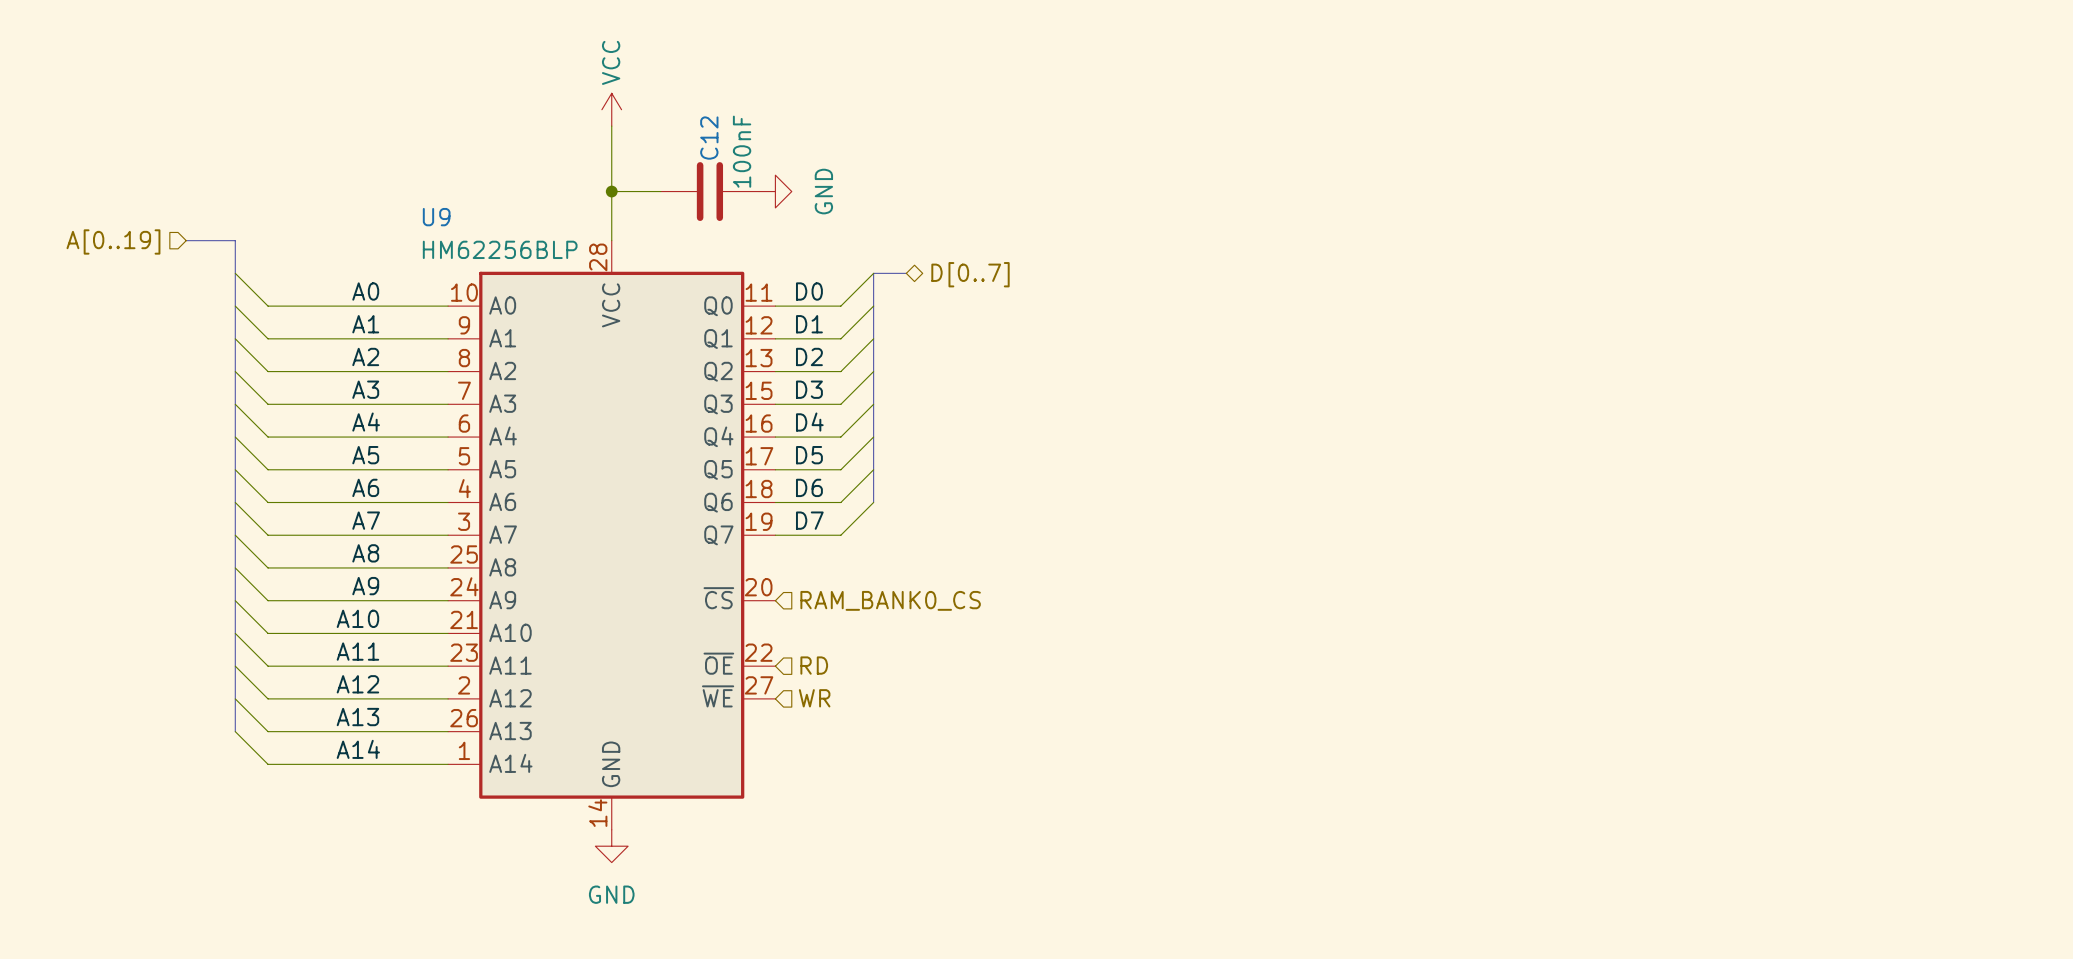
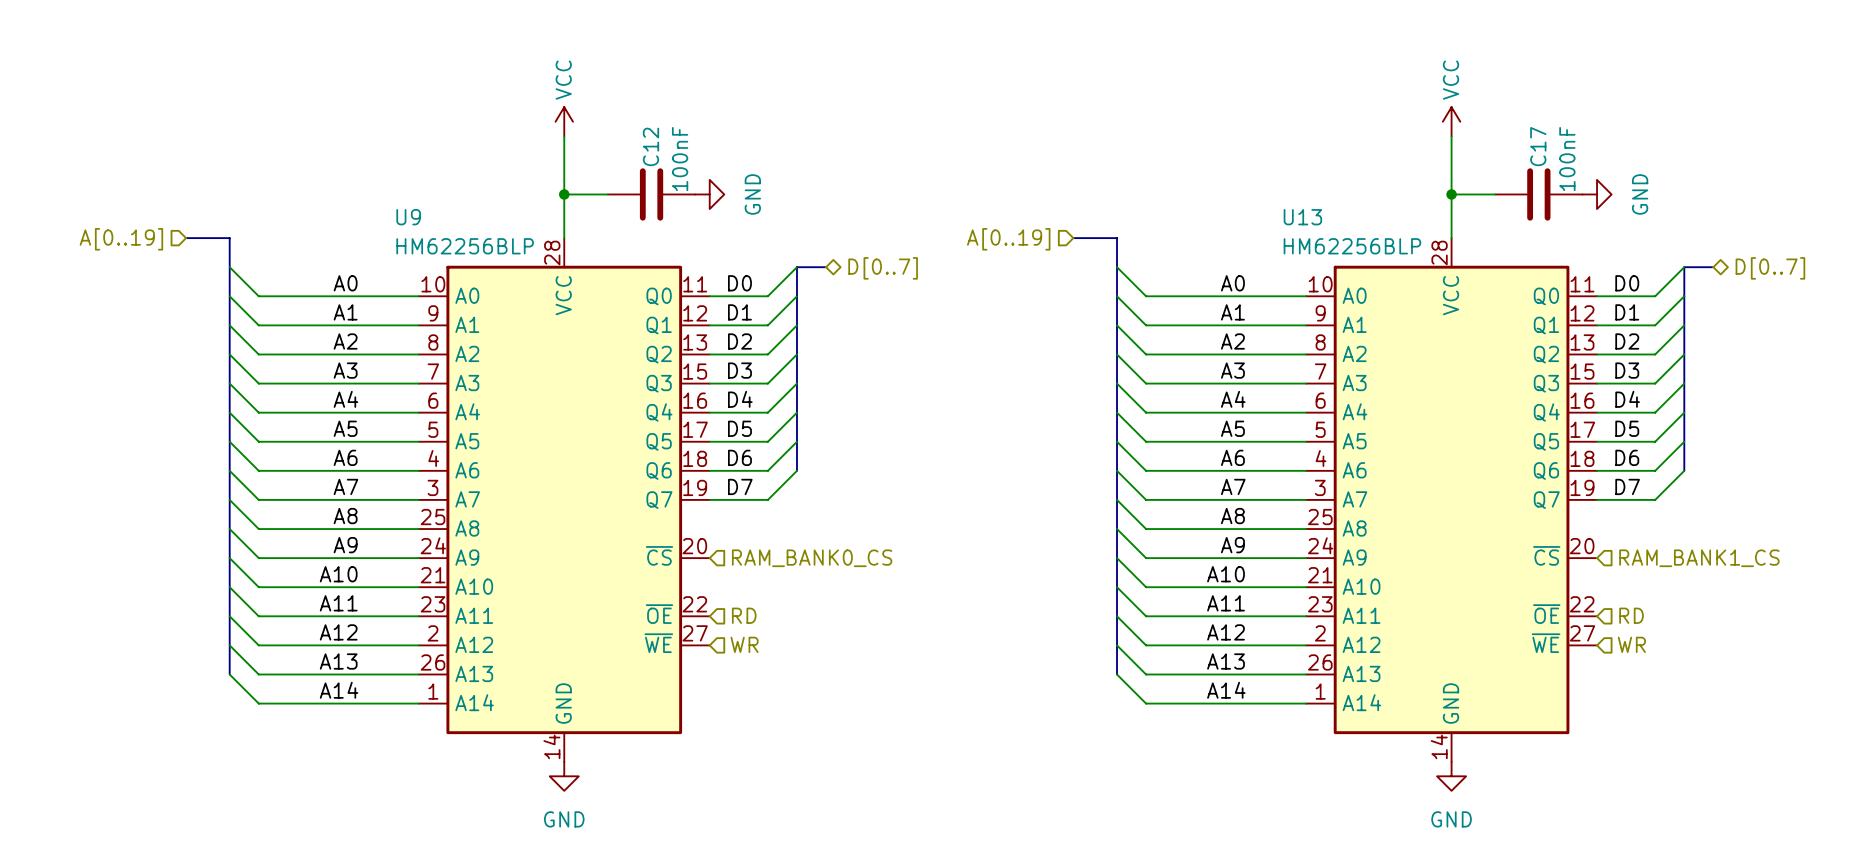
power symbol: none -> VCC (1451, 121)
wire: none -> (1451, 136) (1451, 238)
wire: none -> (1451, 194) (1495, 194)
junction: none -> (1451, 194)
C17: none -> 100nF (1538, 194)
power symbol: none -> GND (1597, 194)
bus: none -> (1073, 238) (1117, 238) (1117, 674)
hierarchical label: none -> A[0..19] (1008, 239)
wire: none -> (1117, 267) (1146, 296) (1306, 296)
wire: none -> (1684, 267) (1655, 296) (1597, 296)
bus: none -> (1713, 267) (1684, 267) (1684, 470)
hierarchical label: none -> D[0..7] (1770, 268)
label: none -> A0 (1232, 283)
label: none -> D0 (1627, 283)
wire: none -> (1117, 296) (1146, 325) (1306, 325)
wire: none -> (1684, 296) (1655, 325) (1597, 325)
label: none -> A1 (1232, 312)
label: none -> D1 (1627, 312)
wire: none -> (1117, 325) (1146, 354) (1306, 354)
wire: none -> (1684, 325) (1655, 354) (1597, 354)
label: none -> A2 (1232, 341)
label: none -> D2 (1627, 341)
wire: none -> (1117, 354) (1146, 383) (1306, 383)
wire: none -> (1684, 354) (1655, 383) (1597, 383)
label: none -> A3 (1232, 370)
label: none -> D3 (1627, 370)
wire: none -> (1117, 383) (1146, 412) (1306, 412)
wire: none -> (1684, 383) (1655, 412) (1597, 412)
label: none -> A4 (1233, 399)
label: none -> D4 (1627, 399)
wire: none -> (1117, 412) (1146, 441) (1306, 441)
wire: none -> (1684, 412) (1655, 441) (1597, 441)
label: none -> A5 (1232, 428)
label: none -> D5 (1627, 428)
wire: none -> (1117, 441) (1146, 470) (1306, 470)
wire: none -> (1684, 441) (1655, 470) (1597, 470)
label: none -> A6 (1232, 457)
label: none -> D6 (1627, 457)
wire: none -> (1117, 470) (1146, 499) (1306, 499)
wire: none -> (1684, 470) (1655, 499) (1597, 499)
label: none -> A7 (1233, 486)
label: none -> D7 (1627, 486)
wire: none -> (1117, 499) (1146, 529) (1306, 529)
U13: none -> HM62256BLP (1451, 499)
label: none -> A8 (1232, 516)
wire: none -> (1117, 529) (1146, 558) (1306, 558)
label: none -> A9 (1232, 545)
wire: none -> (1117, 558) (1146, 587) (1306, 587)
hierarchical label: none -> RAM_BANK1_CS (1699, 558)
label: none -> A10 (1225, 574)
wire: none -> (1117, 587) (1146, 616) (1306, 616)
label: none -> A11 (1225, 603)
hierarchical label: none -> RD (1631, 615)
wire: none -> (1117, 616) (1146, 645) (1306, 645)
label: none -> A12 (1225, 632)
wire: none -> (1117, 645) (1146, 674) (1306, 674)
hierarchical label: none -> WR (1631, 644)
label: none -> A13 (1225, 661)
wire: none -> (1117, 674) (1146, 703) (1306, 703)
label: none -> A14 (1226, 690)
power symbol: none -> GND (1451, 776)

